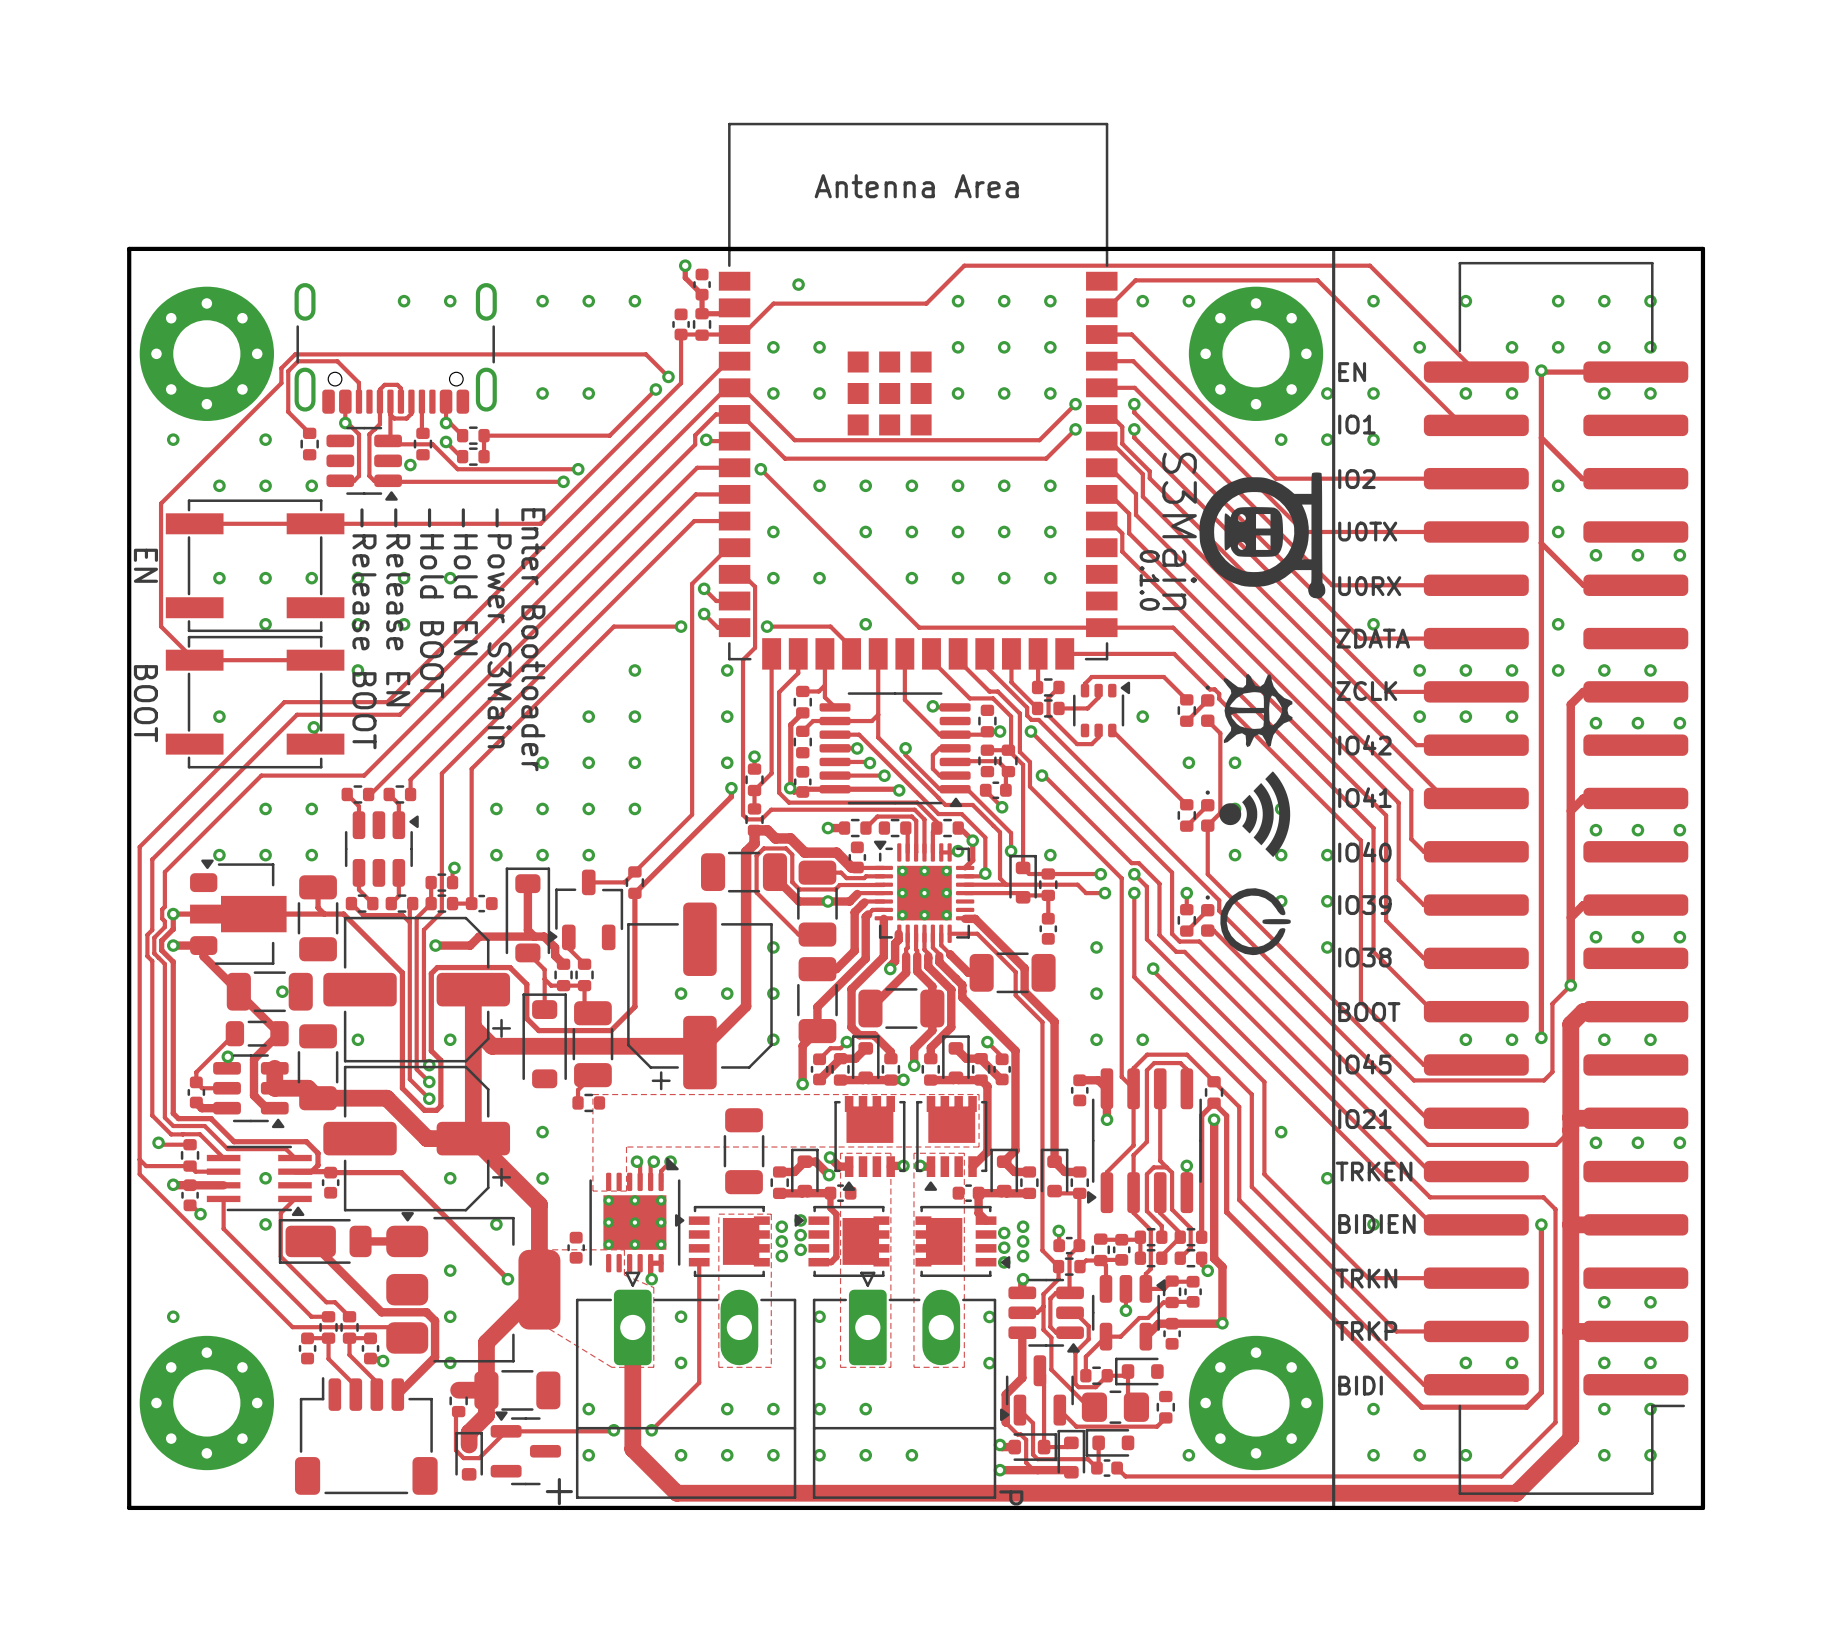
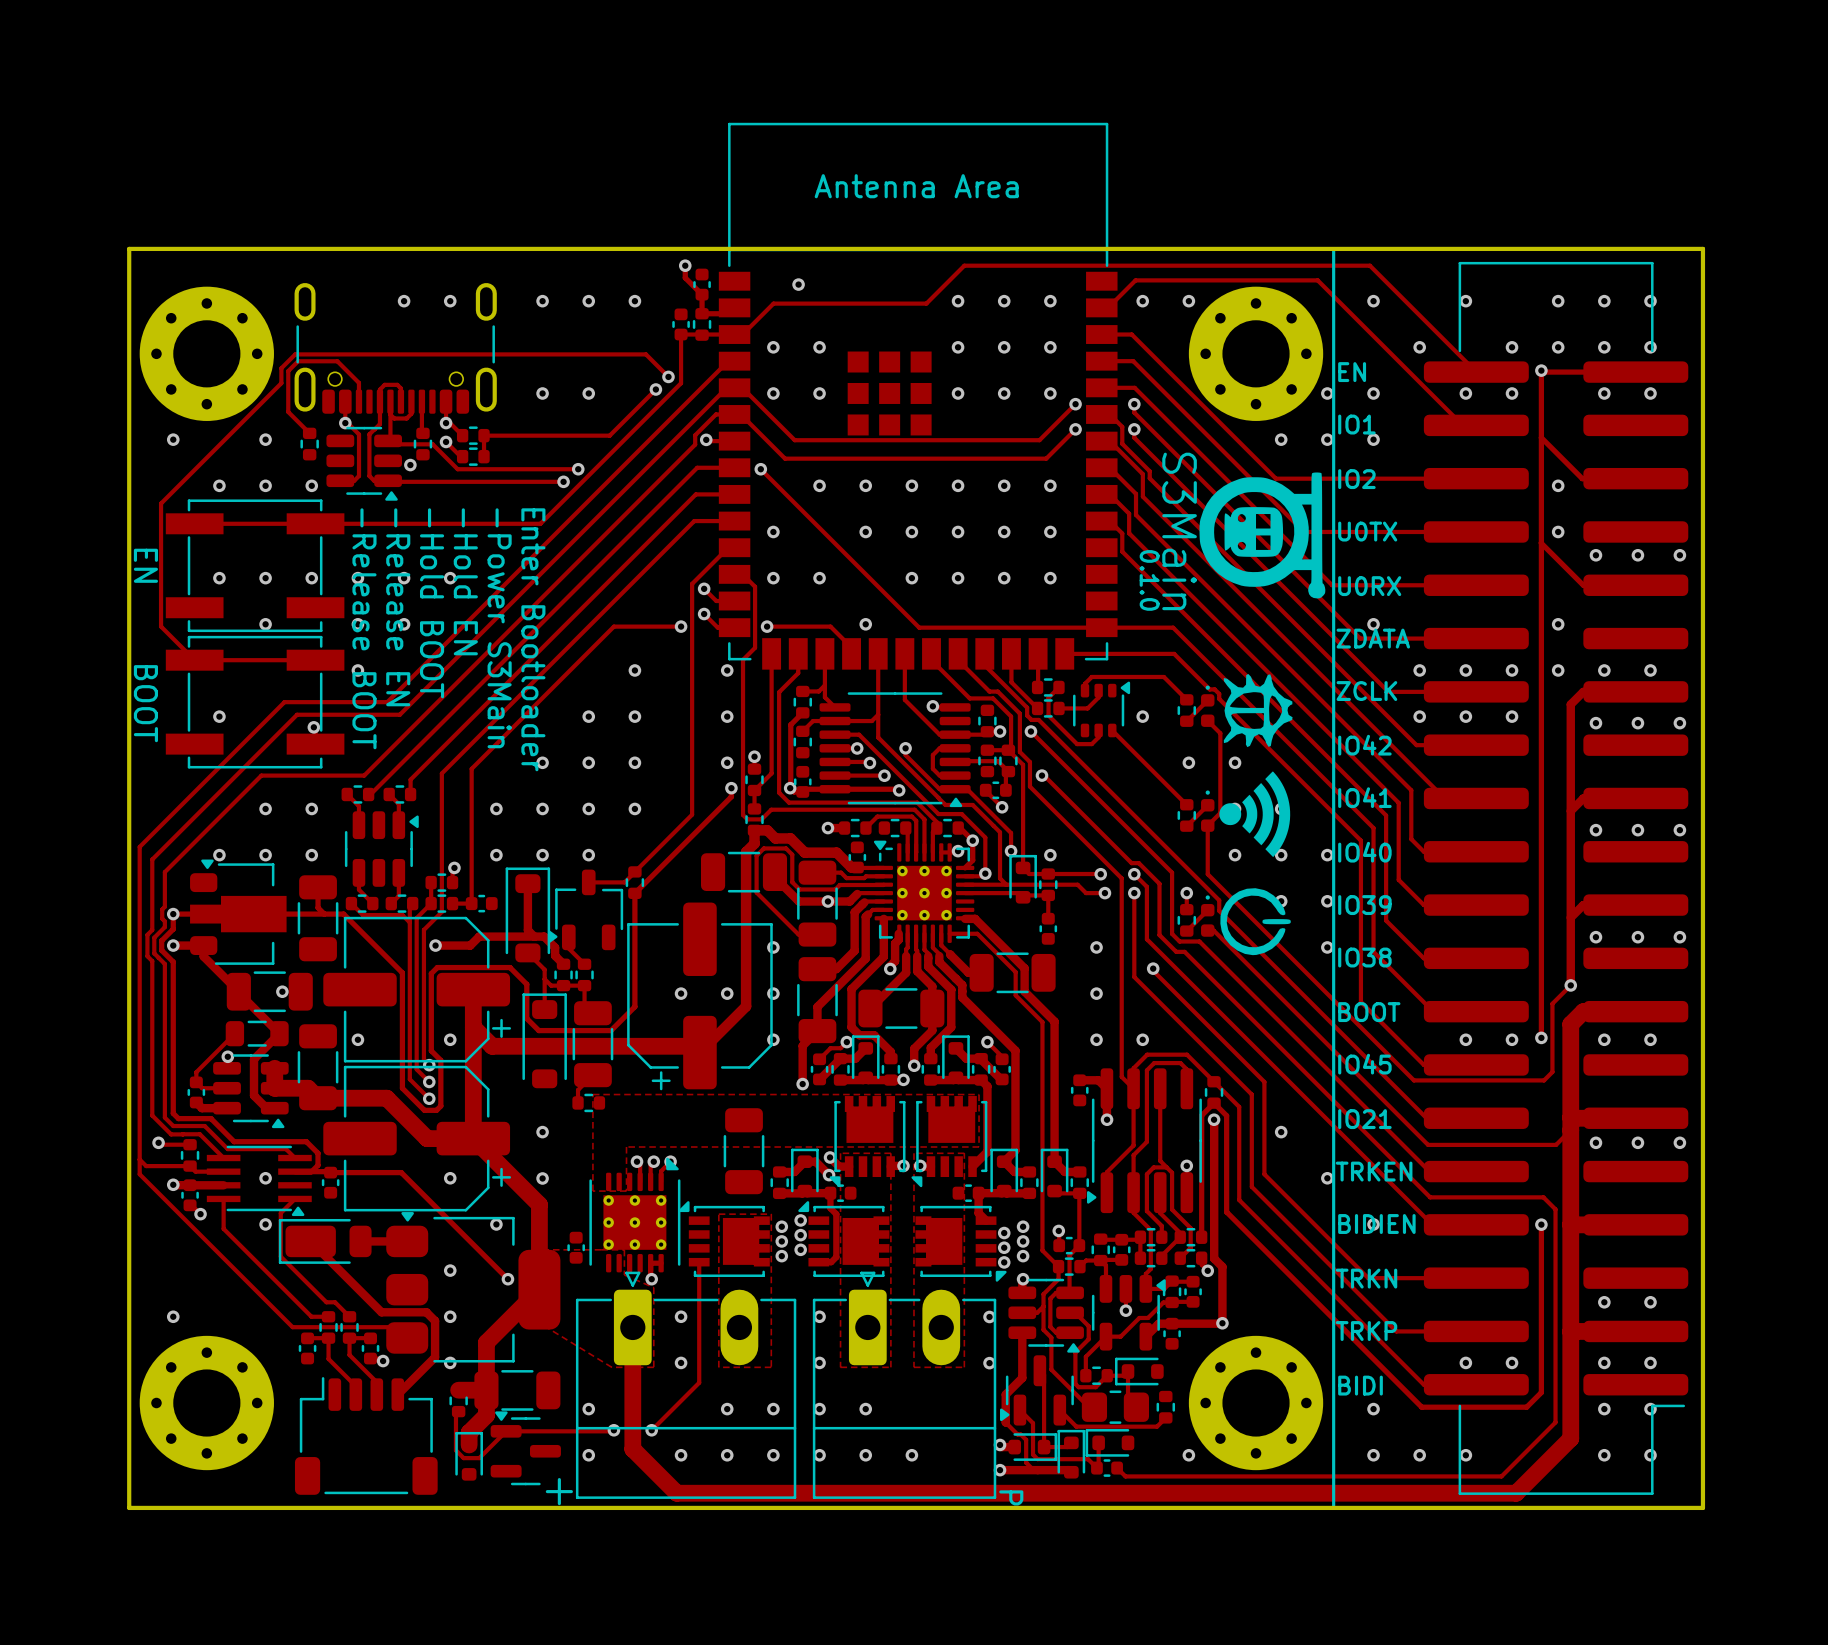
part footprint: [834, 1096, 906, 1191] -> [829, 1096, 906, 1188]
part footprint: [916, 1096, 988, 1191] -> [911, 1096, 988, 1188]
part footprint: [674, 1205, 770, 1278] -> [678, 1201, 770, 1278]
part footprint: [794, 1205, 890, 1278] -> [798, 1201, 890, 1278]
part footprint: [915, 1205, 1011, 1278] -> [915, 1205, 1007, 1282]

